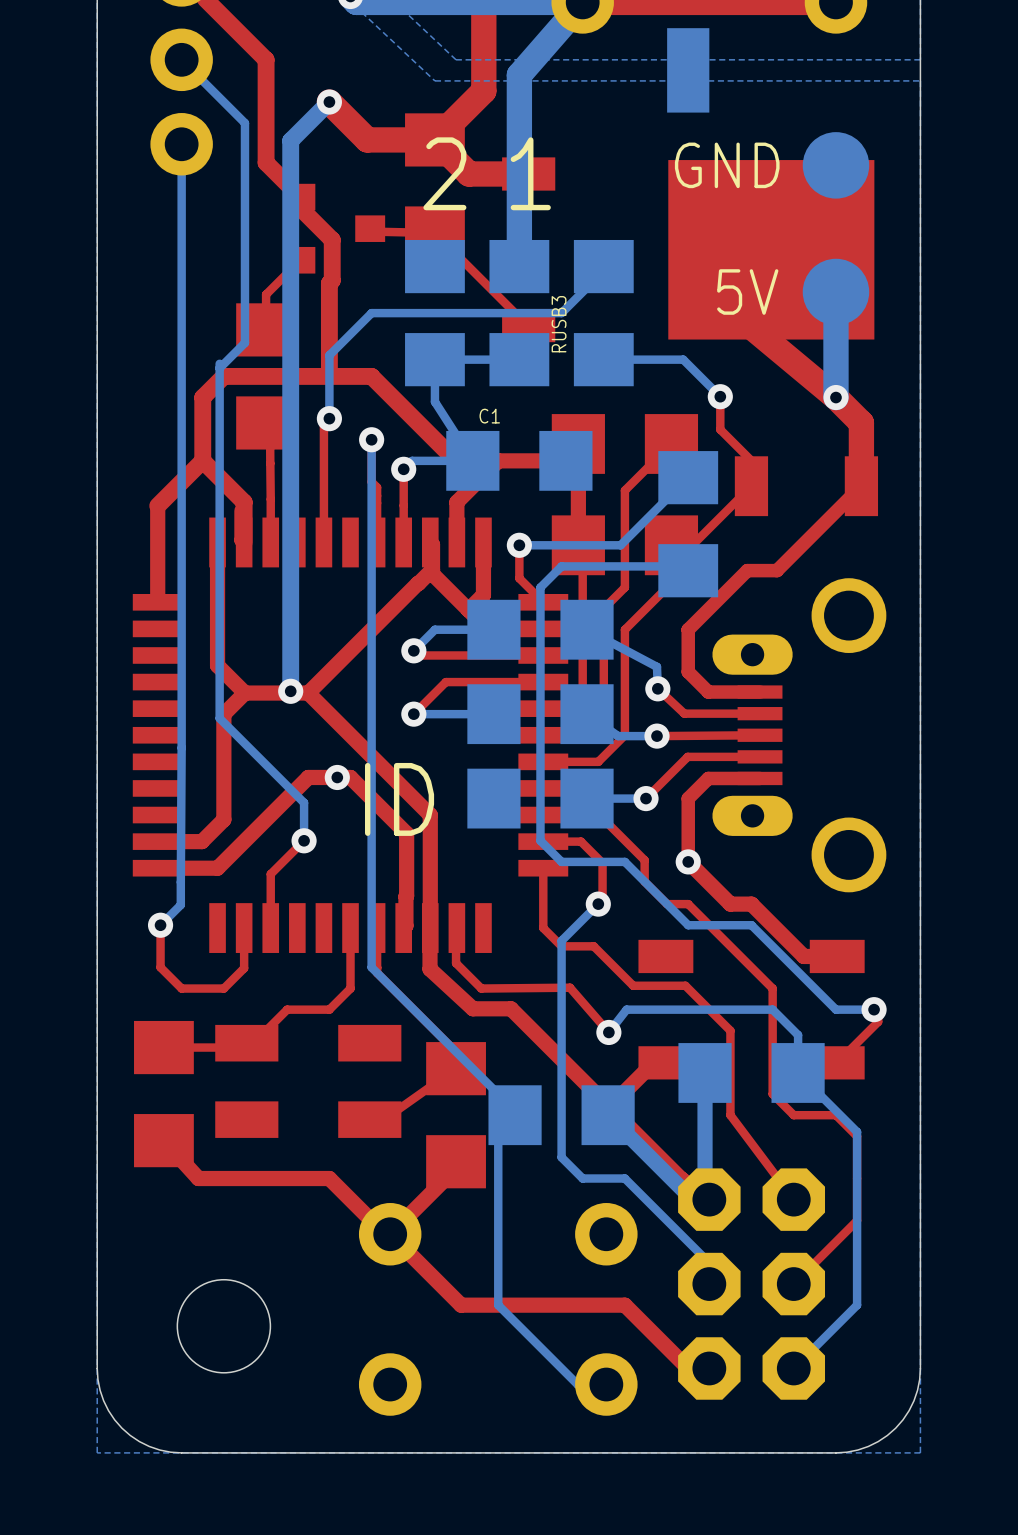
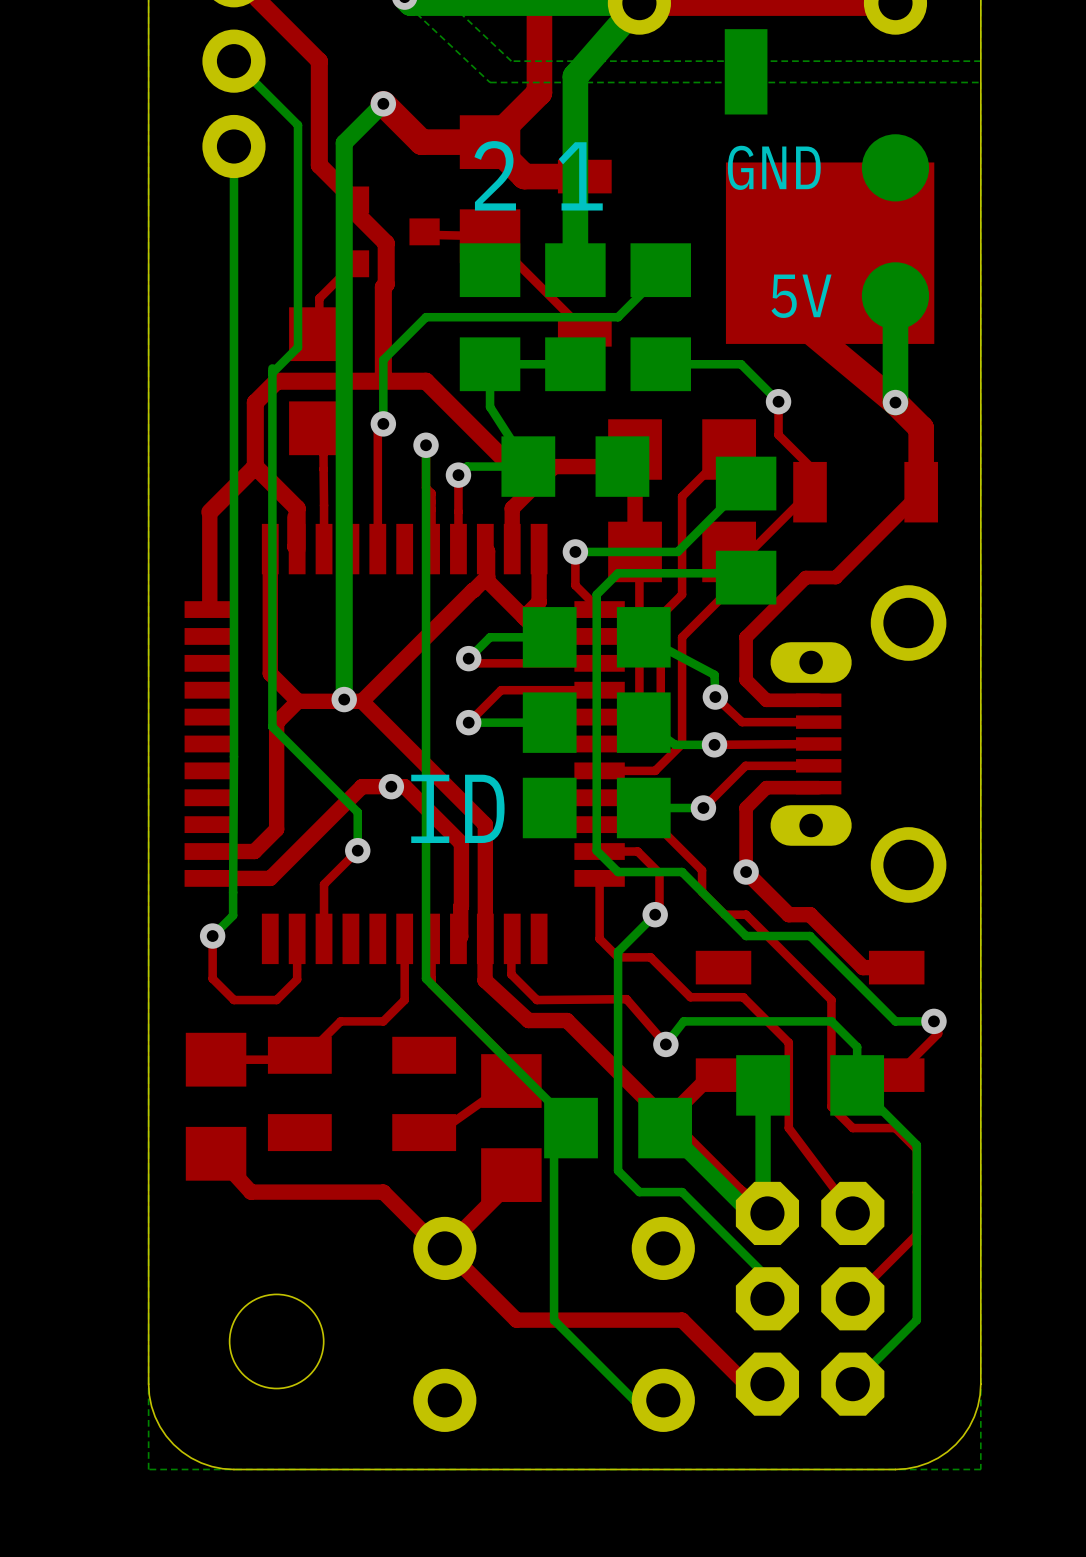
RUSB3 name: RUSB3 (559, 324) -> none
C1 name: C1 (489, 416) -> none

